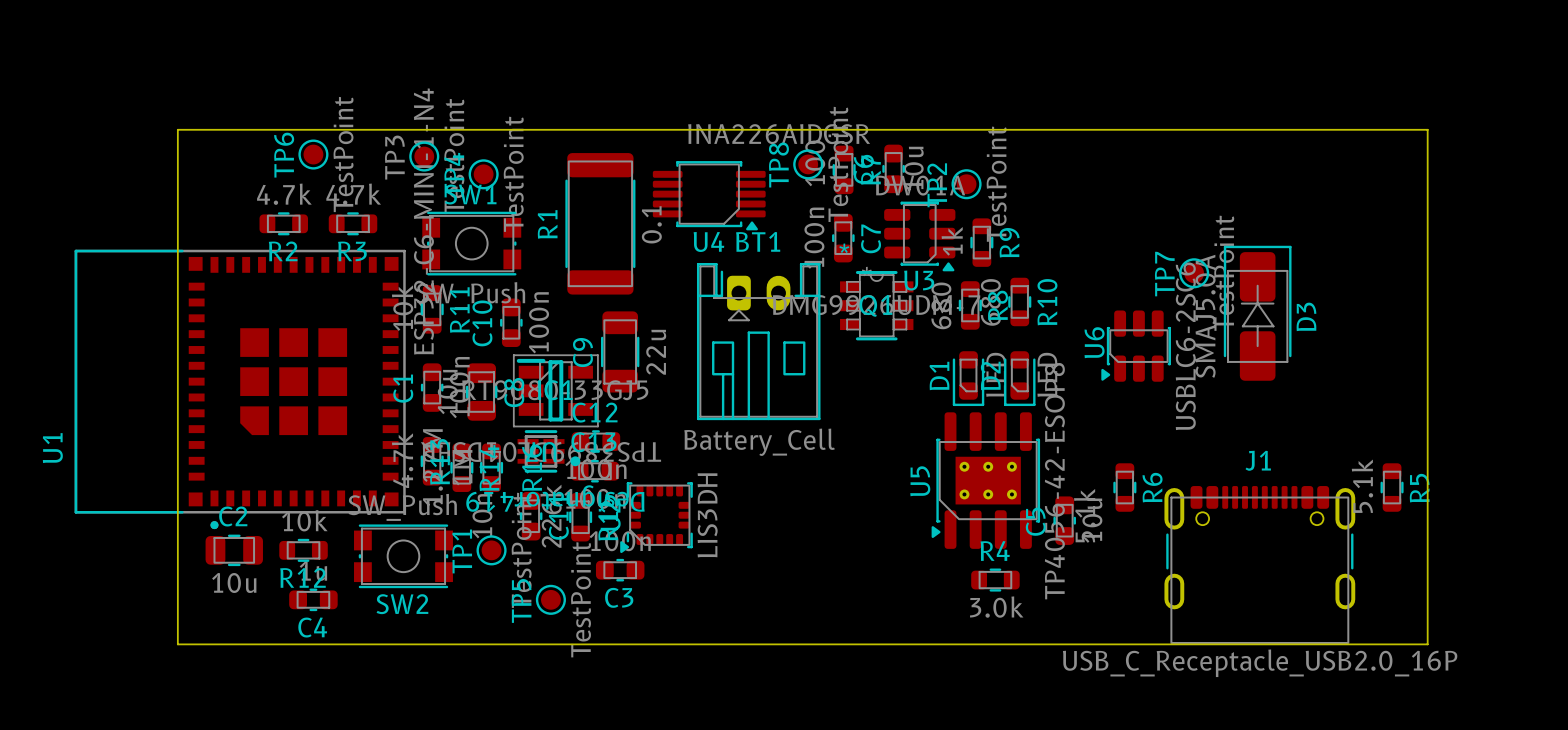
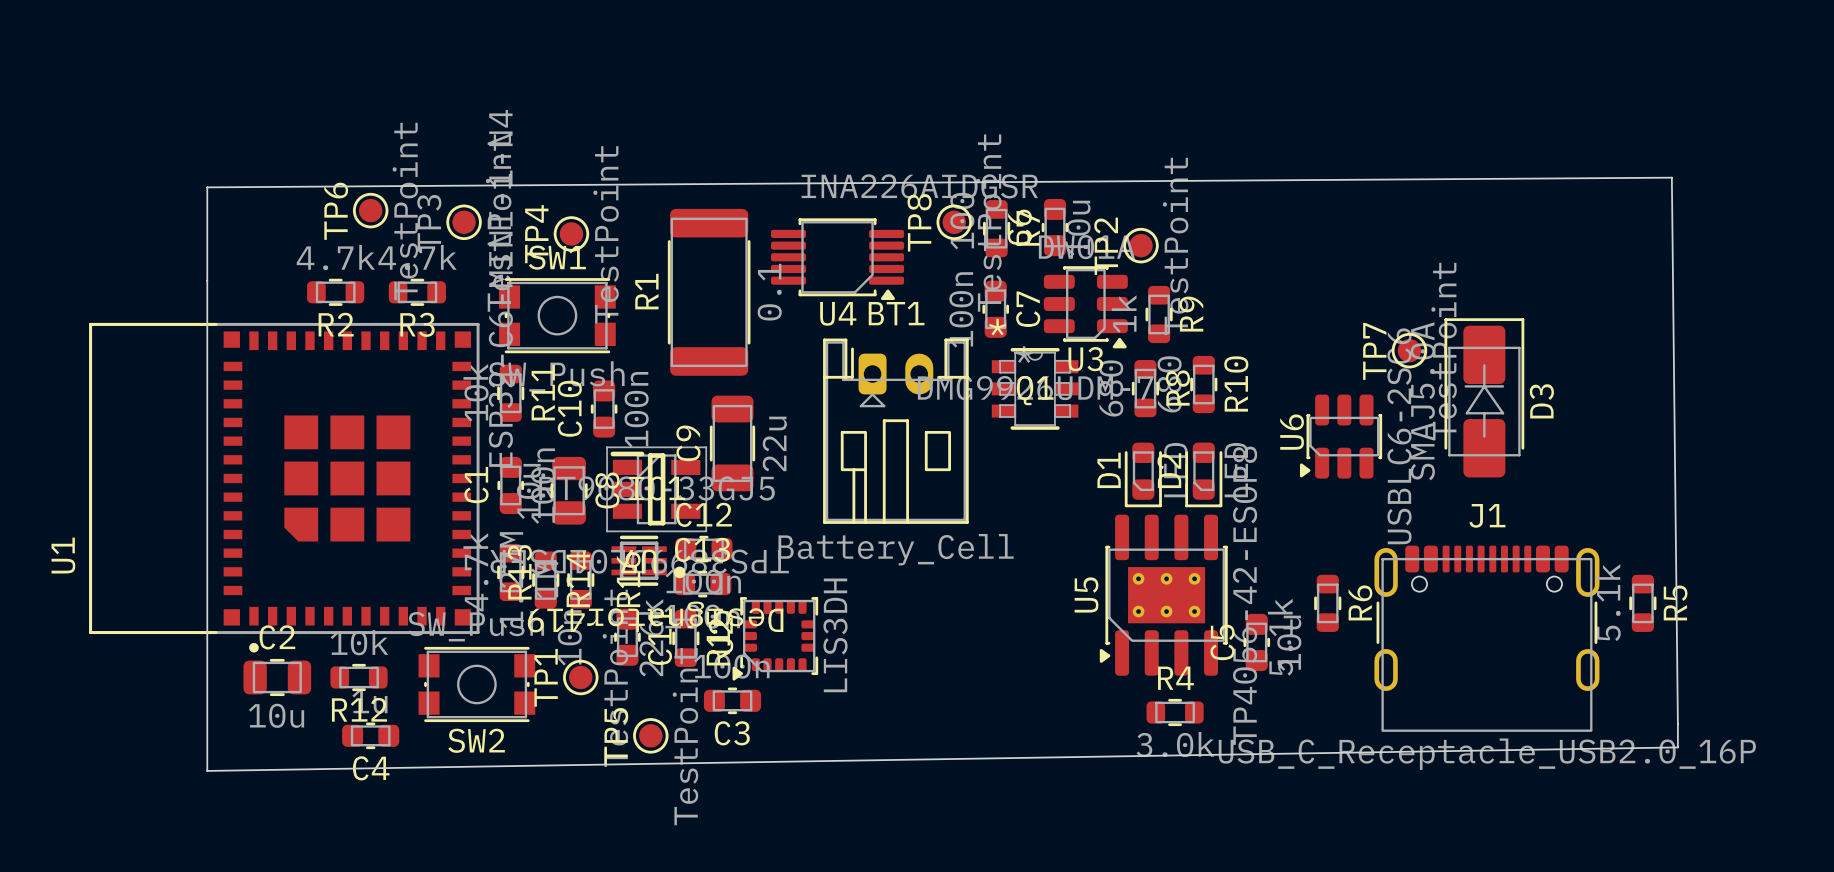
board edge: (177, 129) (1427, 129) (1427, 644) (177, 644) (177, 129) -> (1671, 177) (207, 187) (207, 770) (1677, 747) (1671, 177)
TP3 position: (424, 156) -> (464, 222)
J1 position: (1259, 565) -> (1486, 638)

